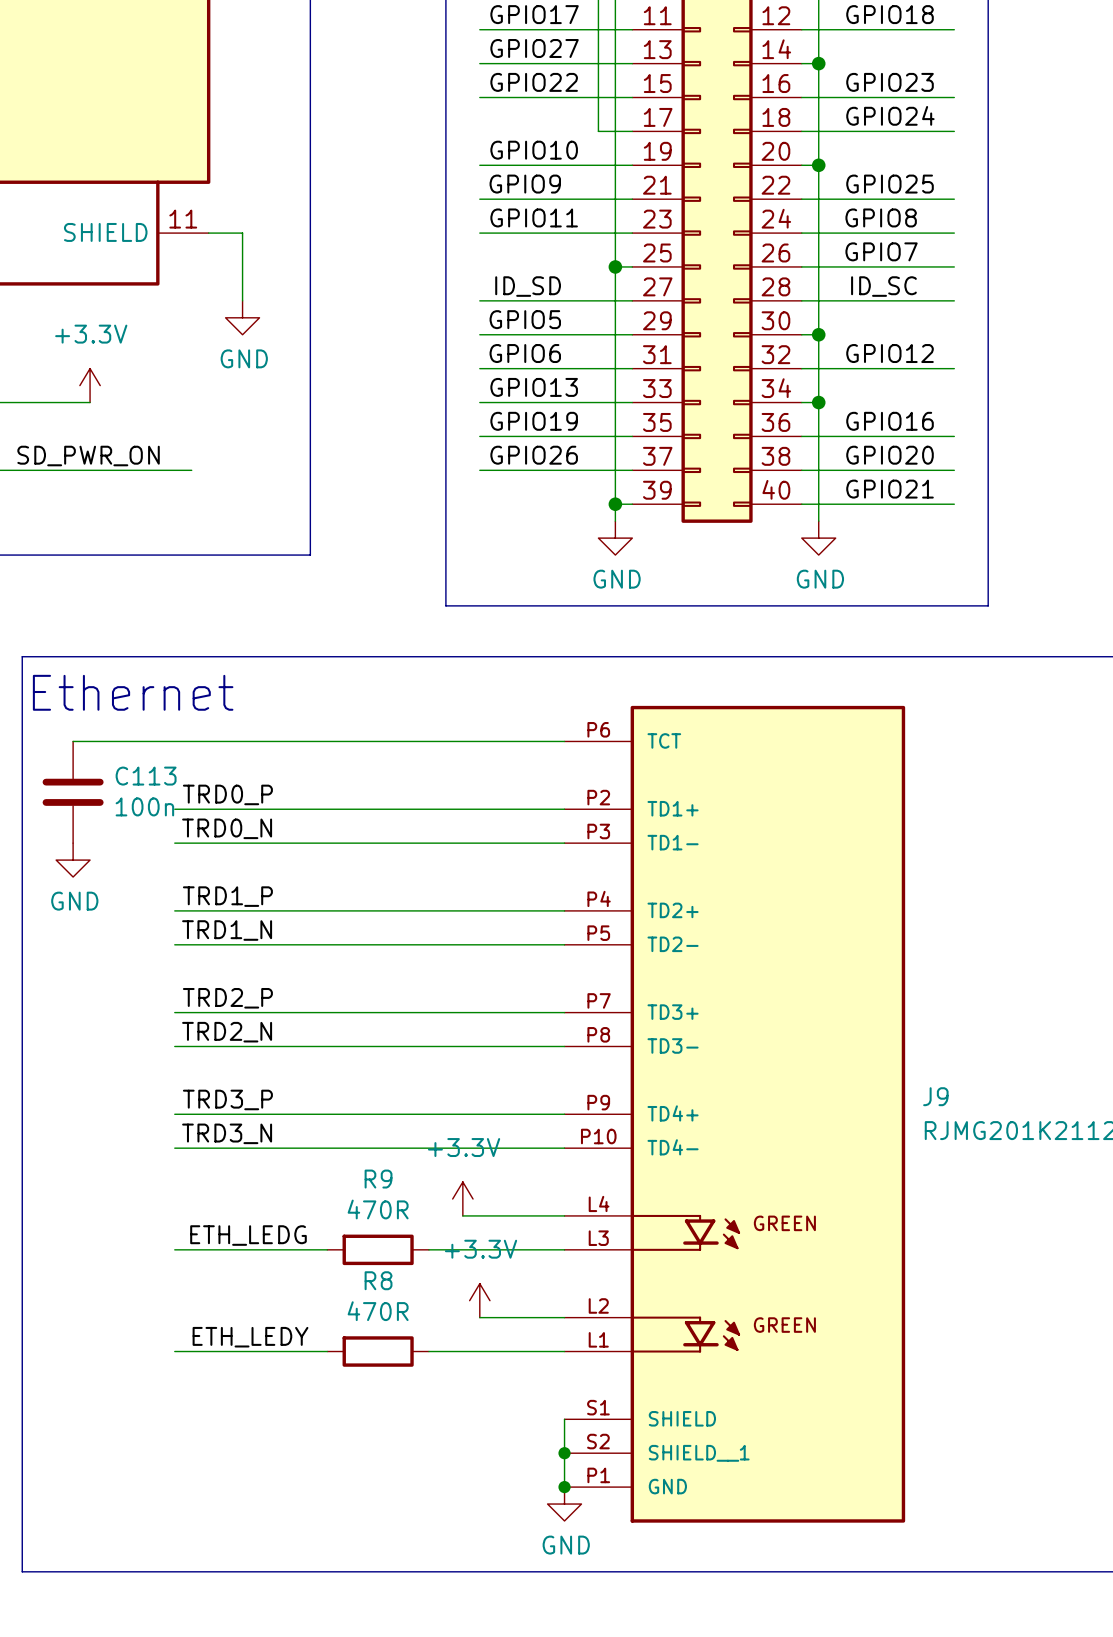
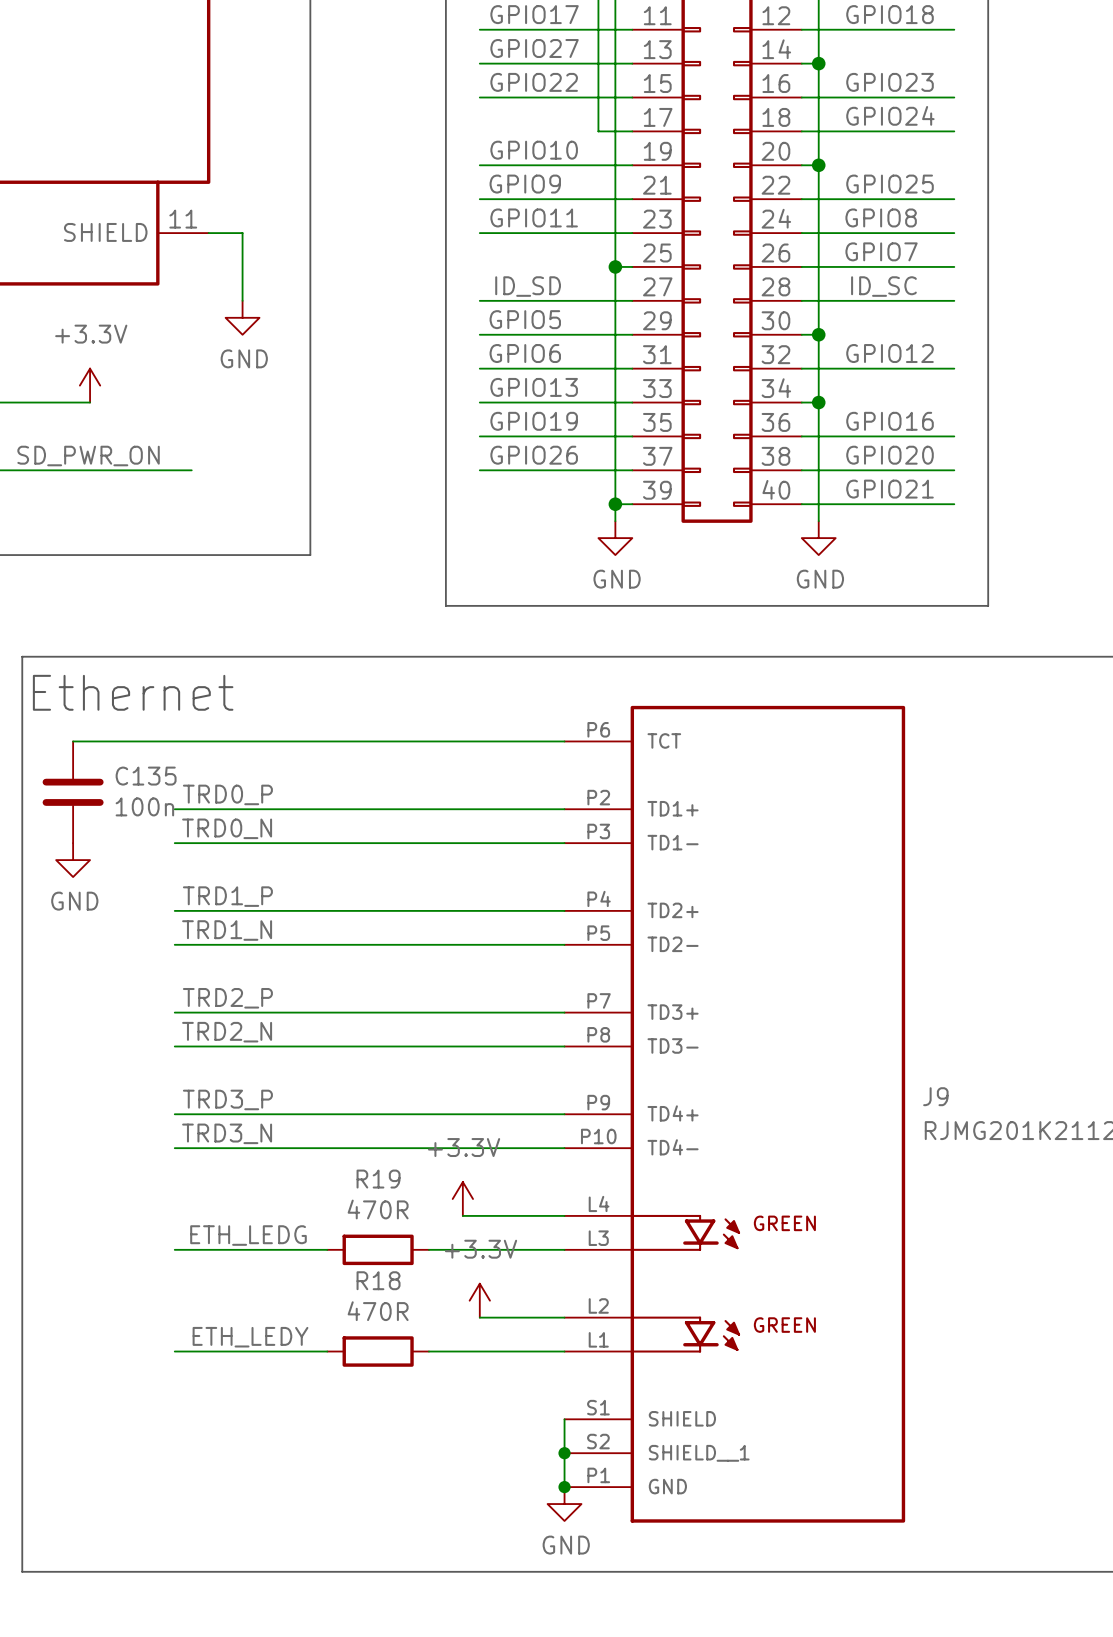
C113 name: C113 (146, 776) -> C135 (146, 776)
R9 name: R9 (378, 1179) -> R19 (378, 1179)
R8 name: R8 (378, 1280) -> R18 (378, 1280)

